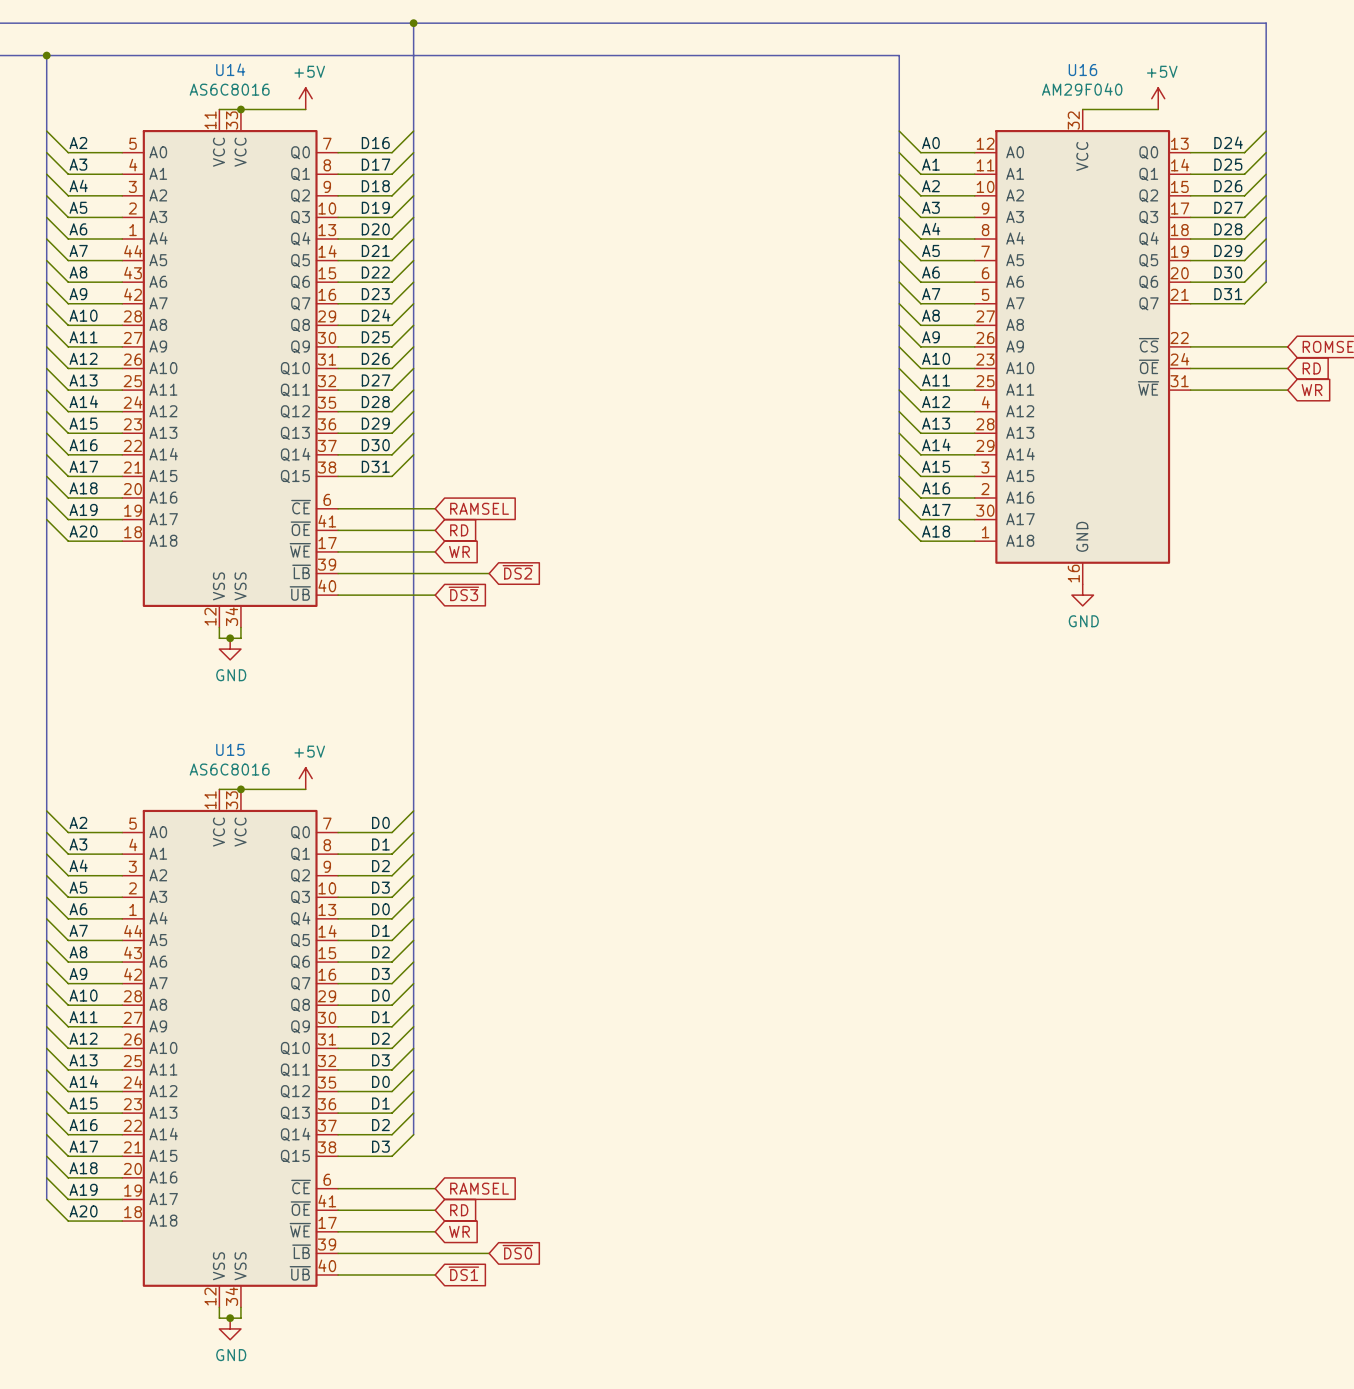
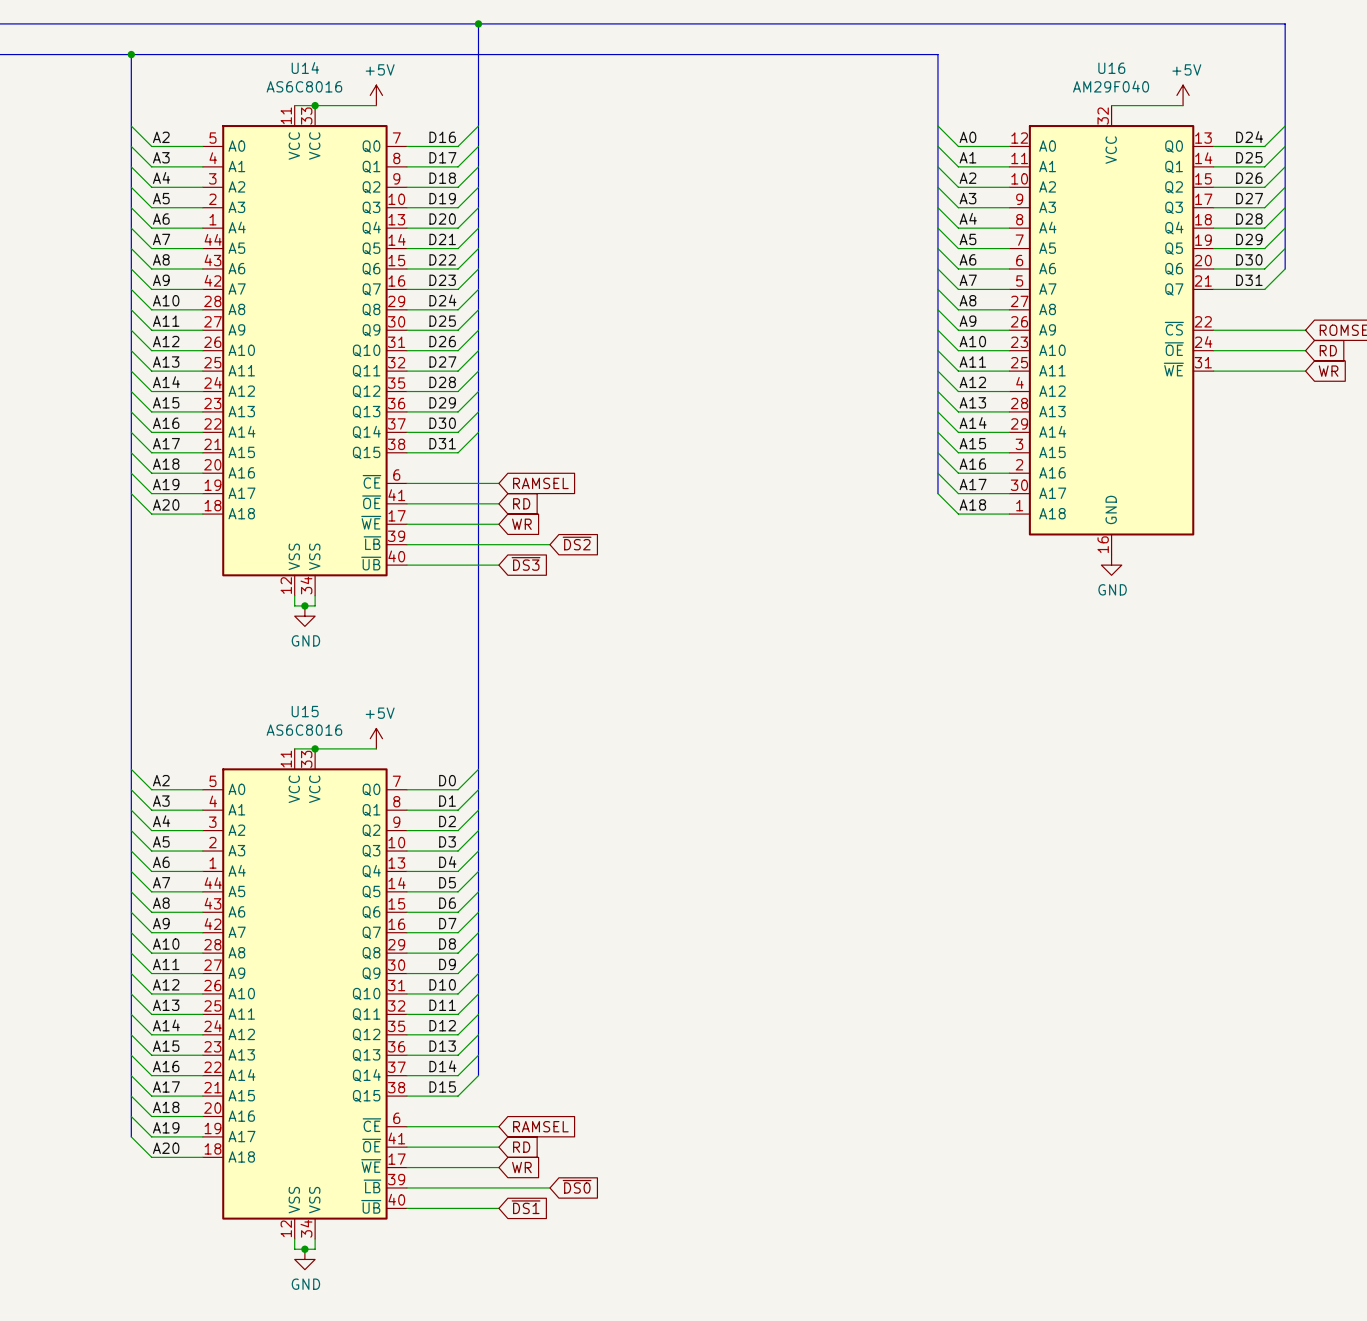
label: D0 (380, 909) -> D4 (447, 862)
label: D1 (380, 930) -> D5 (447, 882)
label: D2 (380, 952) -> D6 (447, 903)
label: D3 (380, 973) -> D7 (447, 923)
label: D0 (380, 995) -> D8 (447, 944)
label: D1 (380, 1017) -> D9 (447, 964)
label: D2 (380, 1038) -> D10 (442, 984)
label: D3 (380, 1060) -> D11 (442, 1005)
label: D0 (380, 1081) -> D12 (442, 1025)
label: D1 (380, 1103) -> D13 (442, 1046)
label: D2 (380, 1125) -> D14 (442, 1066)
label: D3 (380, 1146) -> D15 (442, 1086)

